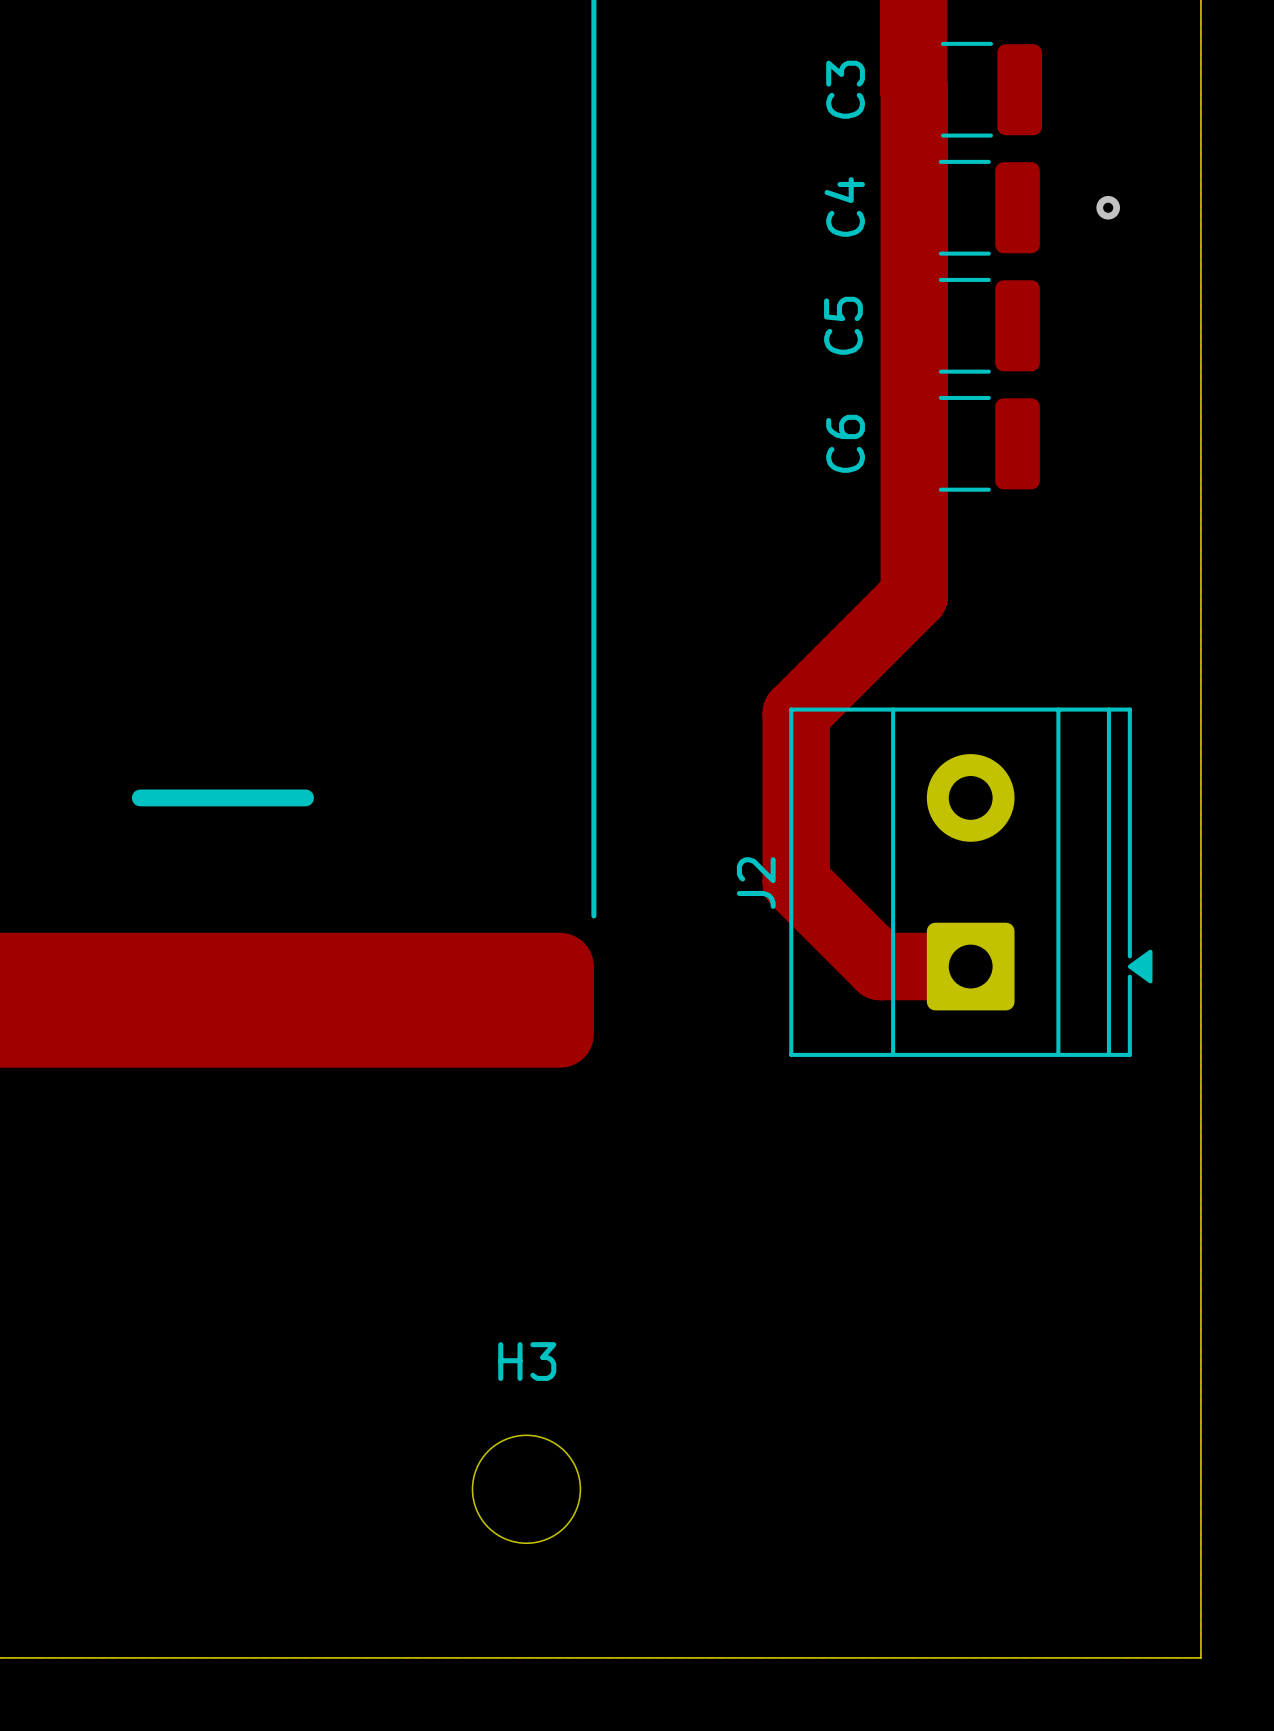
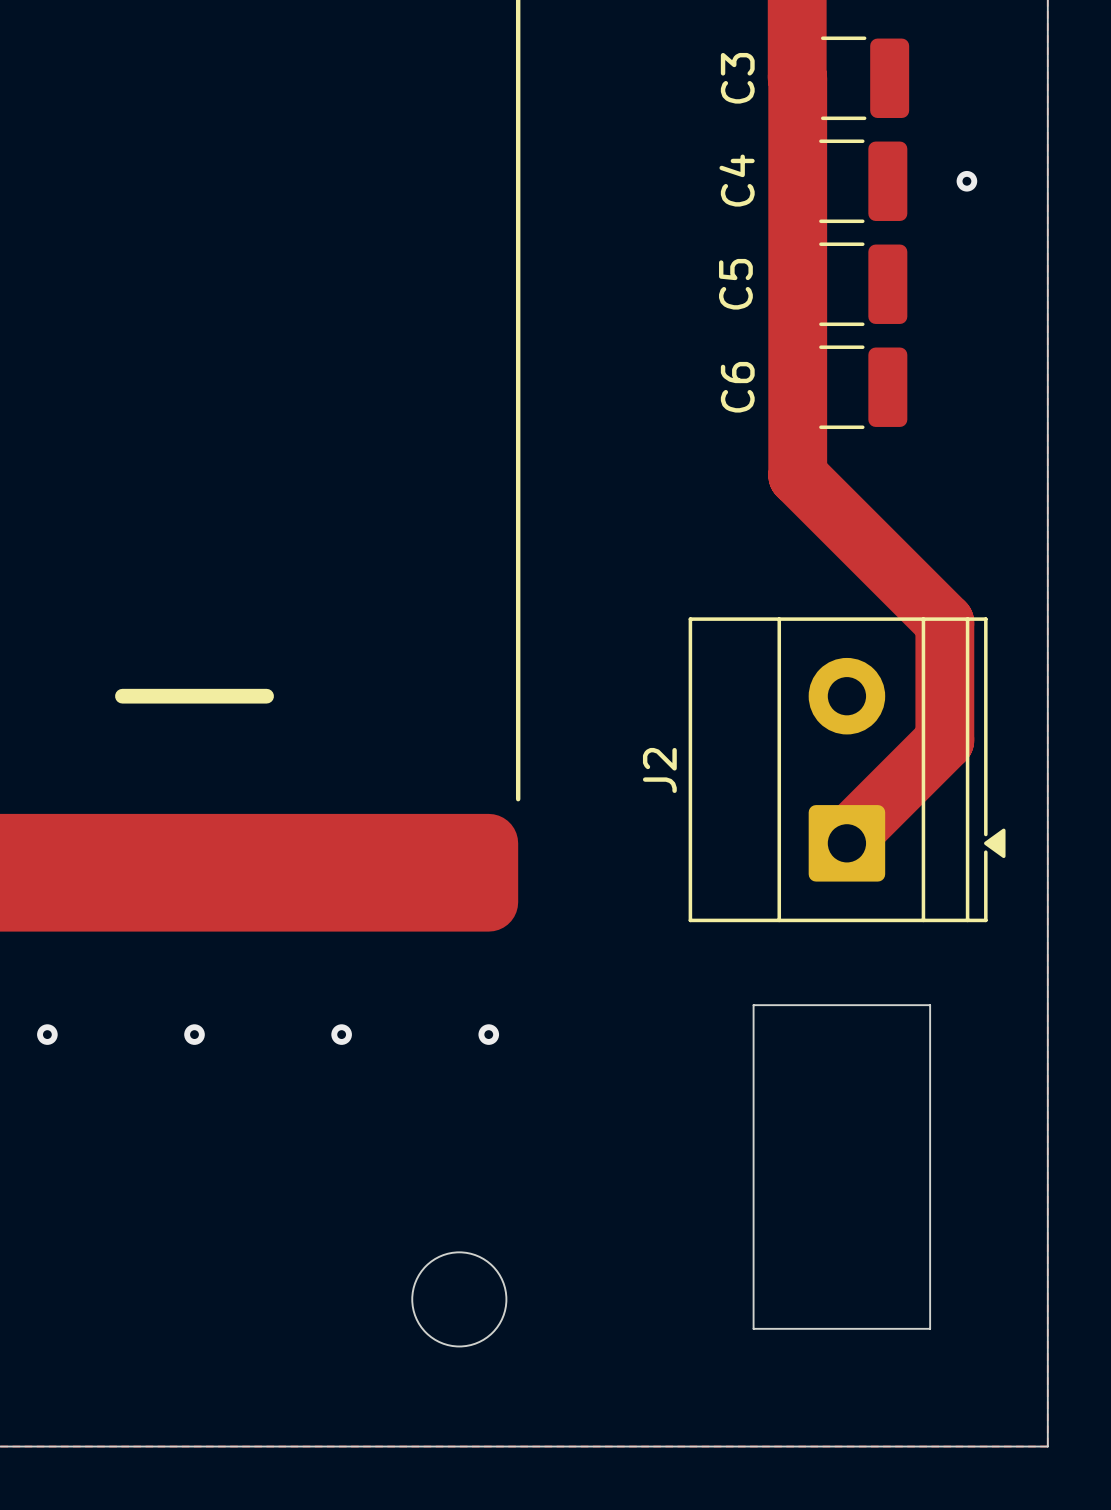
track: (914, 544) (914, 595) (796, 713) (796, 882) (880, 966) (970, 966) -> (797, 475) (944, 622) (944, 740) (846, 838) (846, 843)
board edge: none -> (753, 1005) (930, 1005) (930, 1328) (753, 1328) (753, 1005)
via: none -> (47, 1034)
via: none -> (194, 1034)
via: none -> (341, 1034)
via: none -> (488, 1034)
H3 name: H3 (527, 1361) -> none

